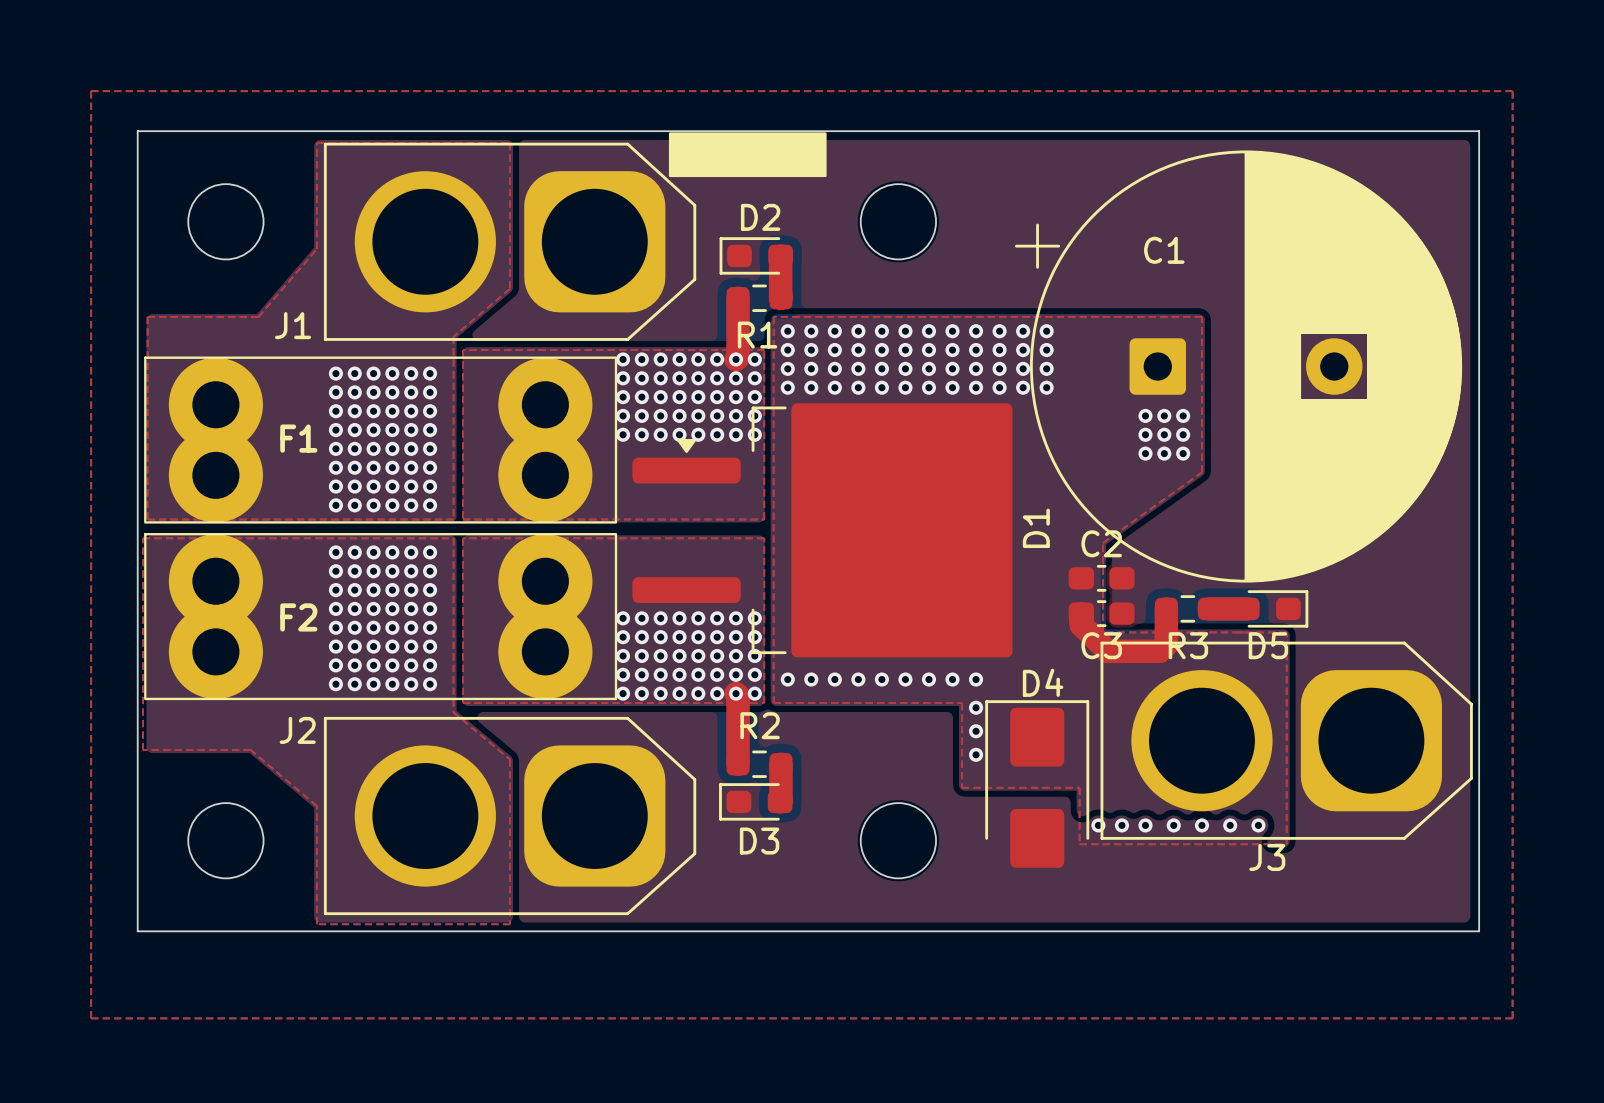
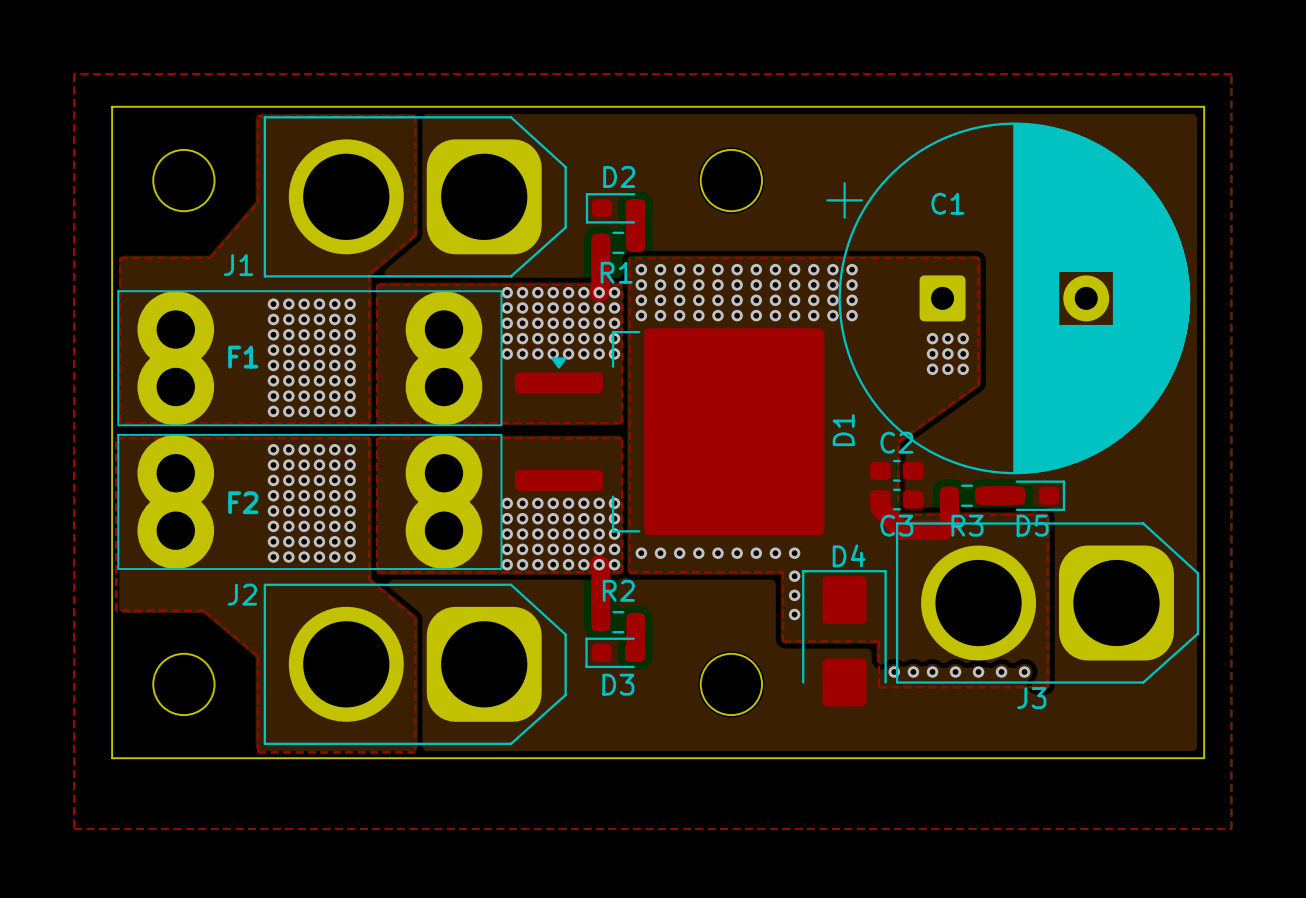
drawing: [668, 132, 827, 178] -> none

